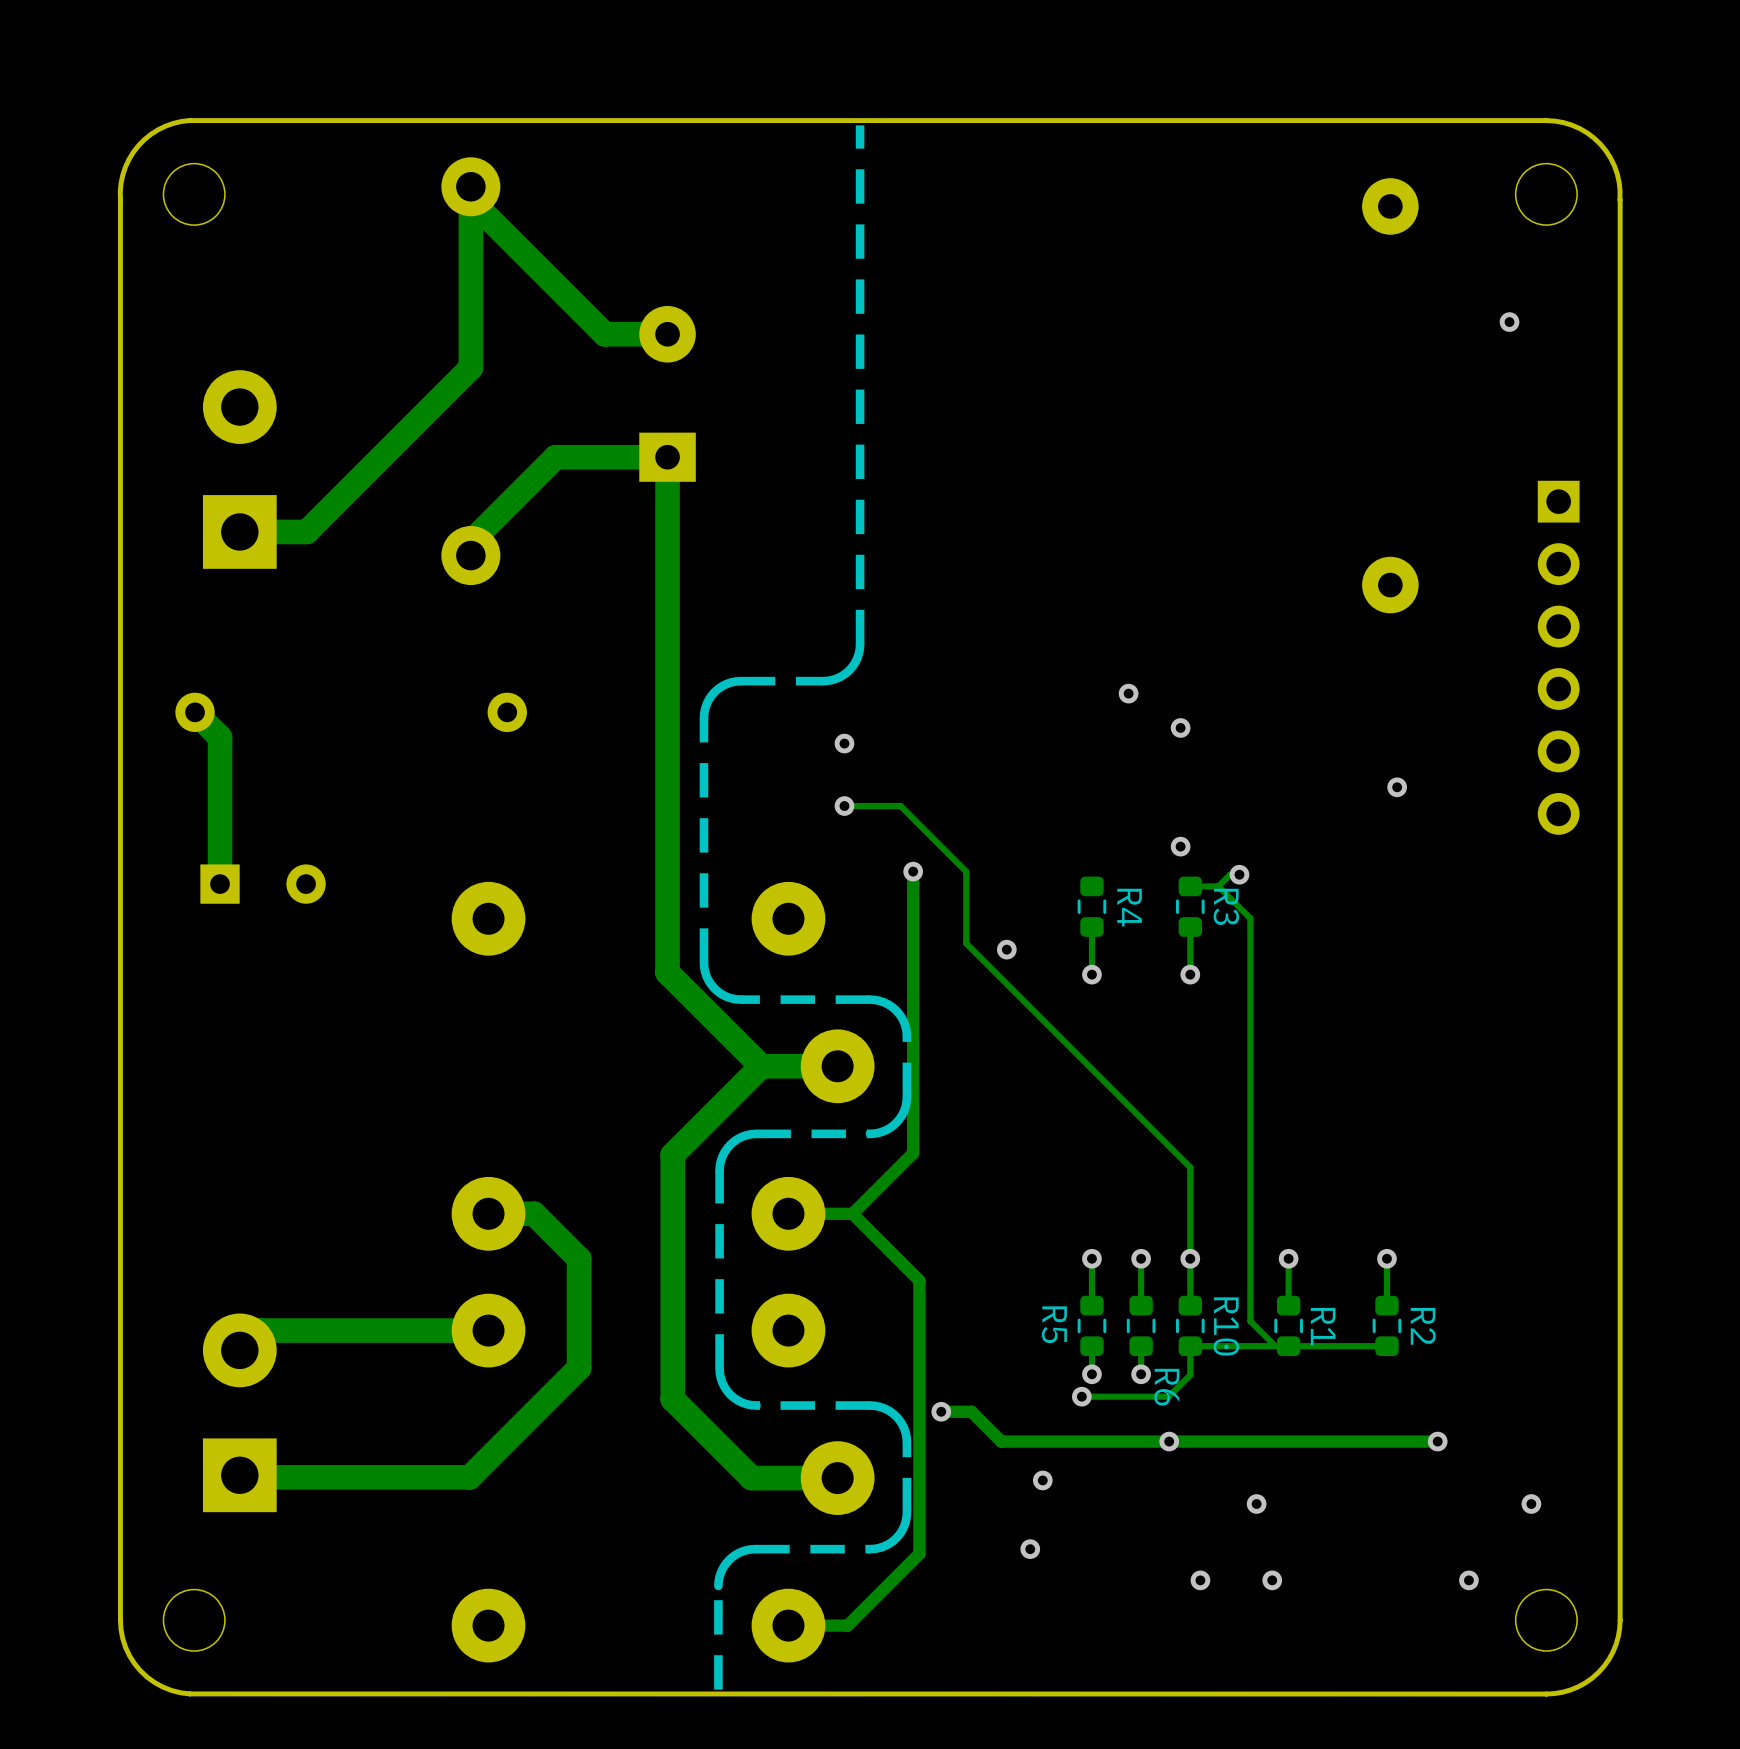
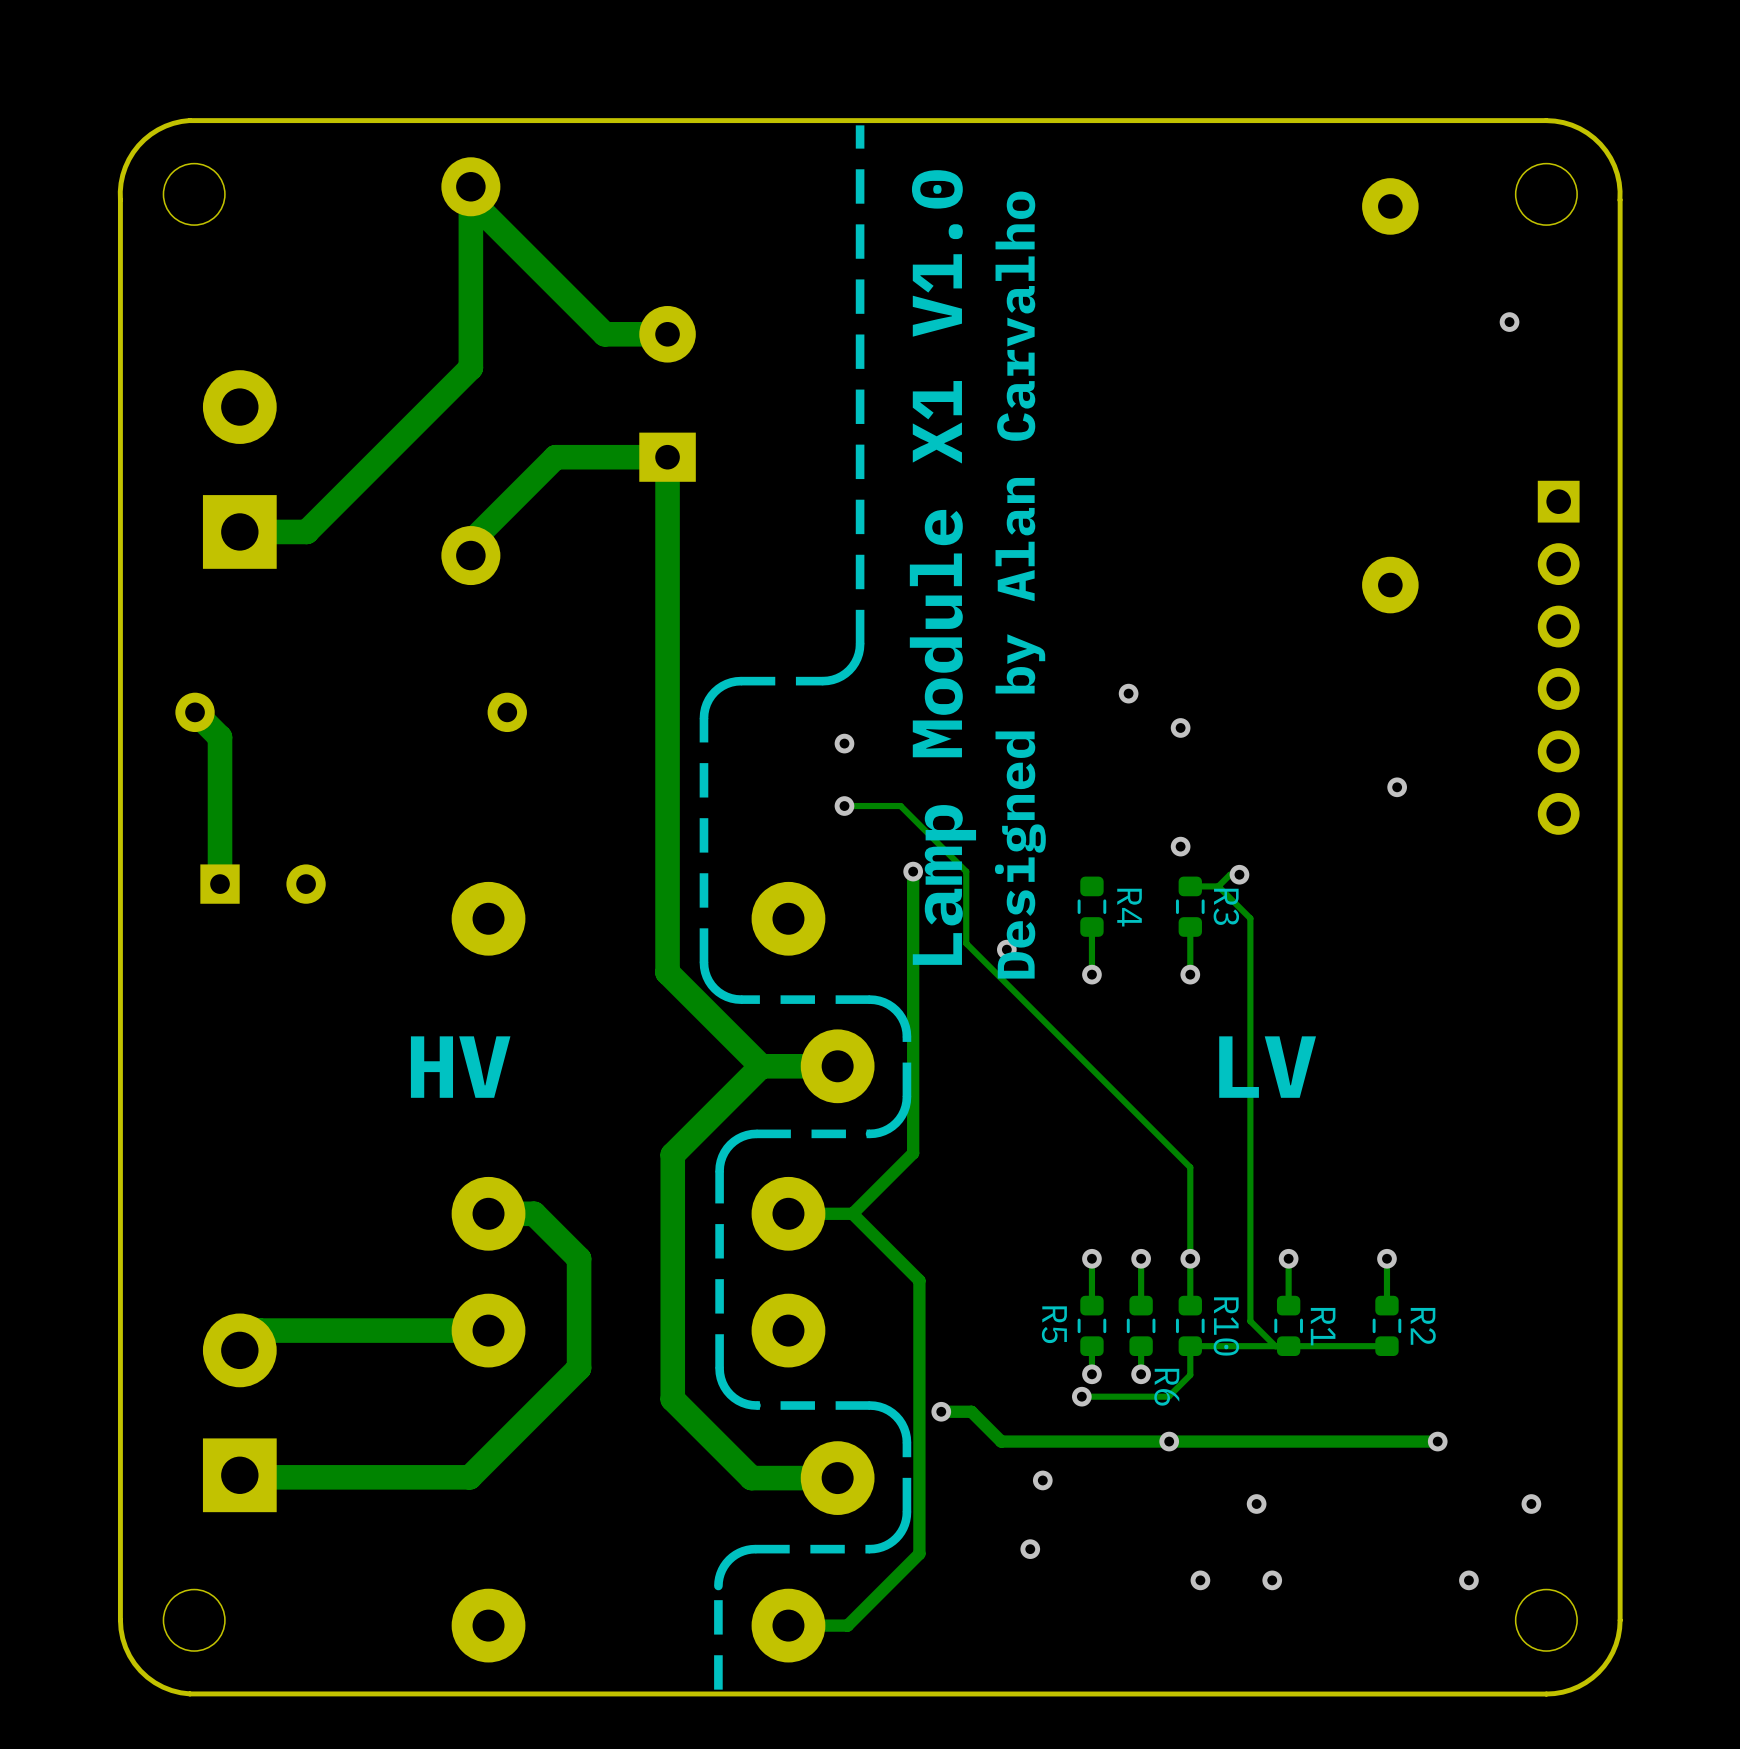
text: none -> Lamp Module X1 V1.0 (942, 567)
text: none -> Designed by Alan Carvalho (1020, 585)
text: none -> HV (460, 1067)
text: none -> LV (1267, 1067)

